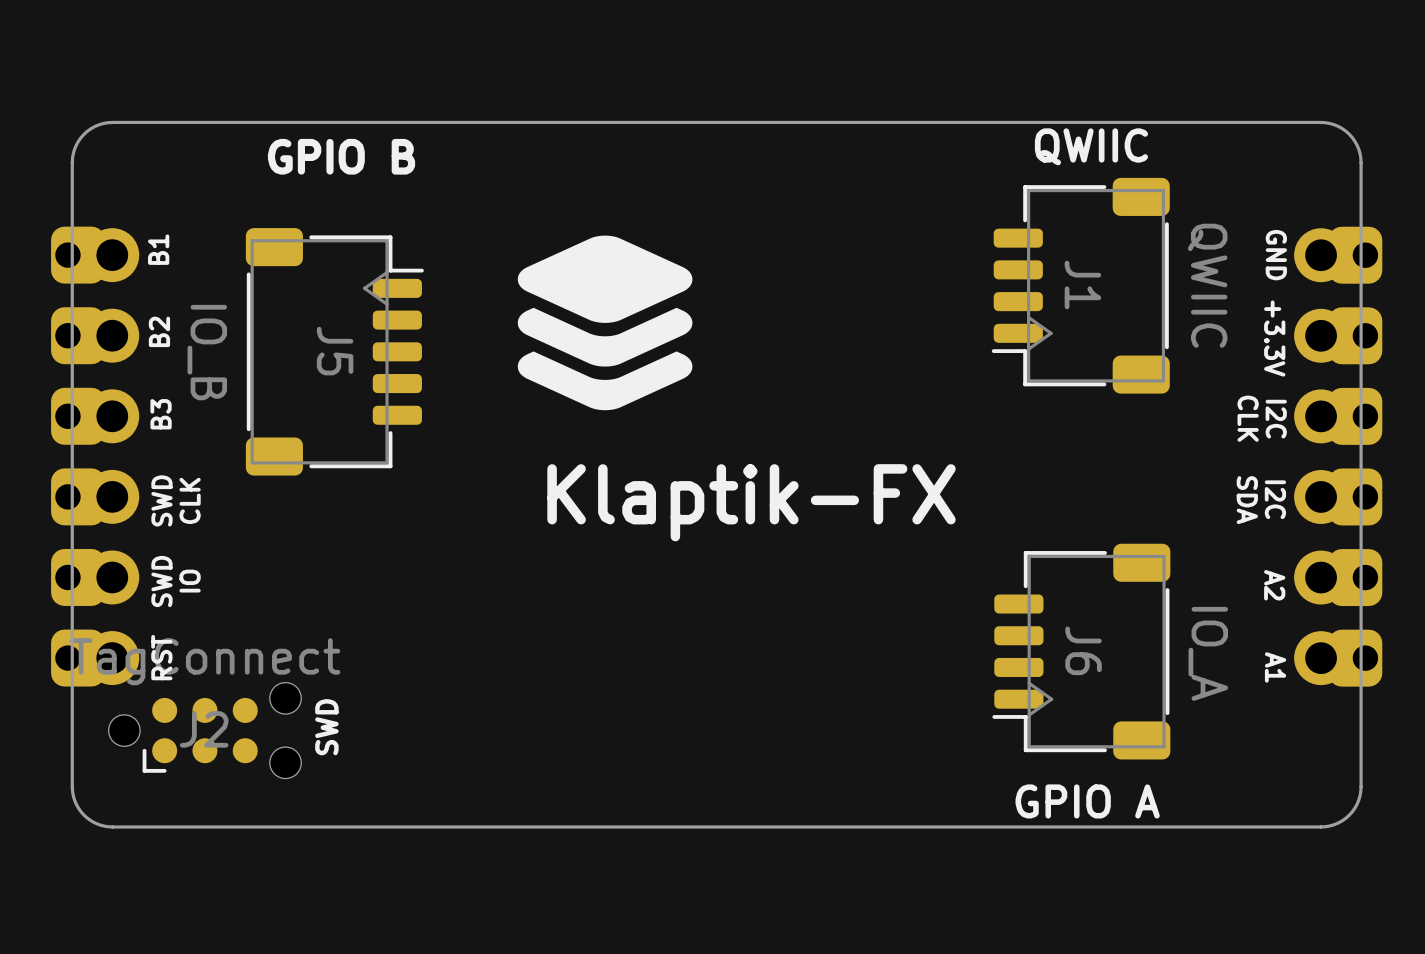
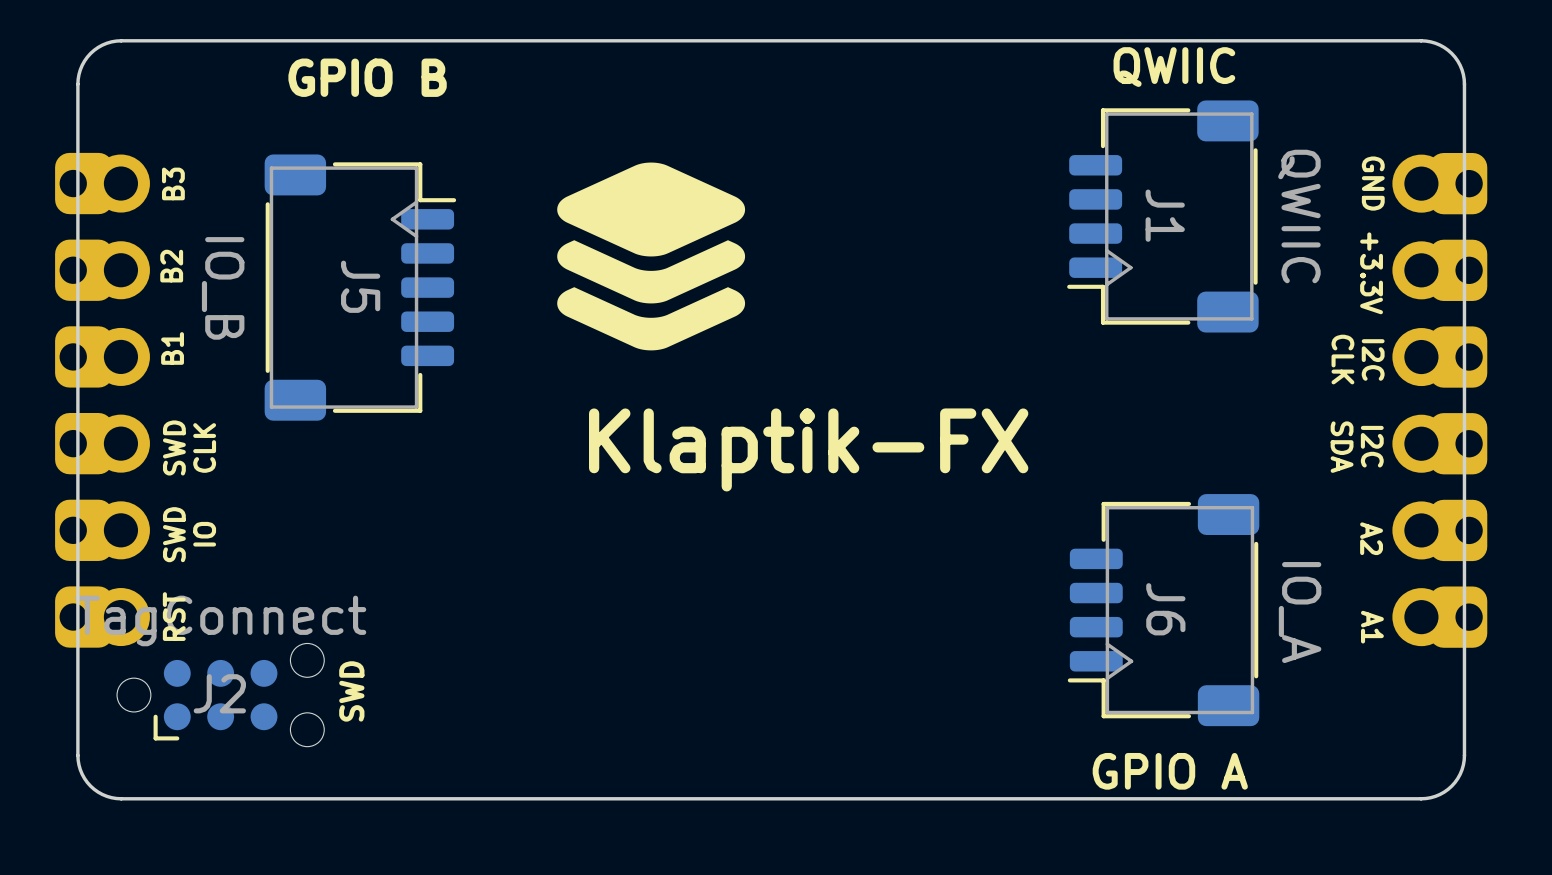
text position: B1 (158, 249) -> B1 (172, 348)
text position: B3 (161, 414) -> B3 (173, 183)

